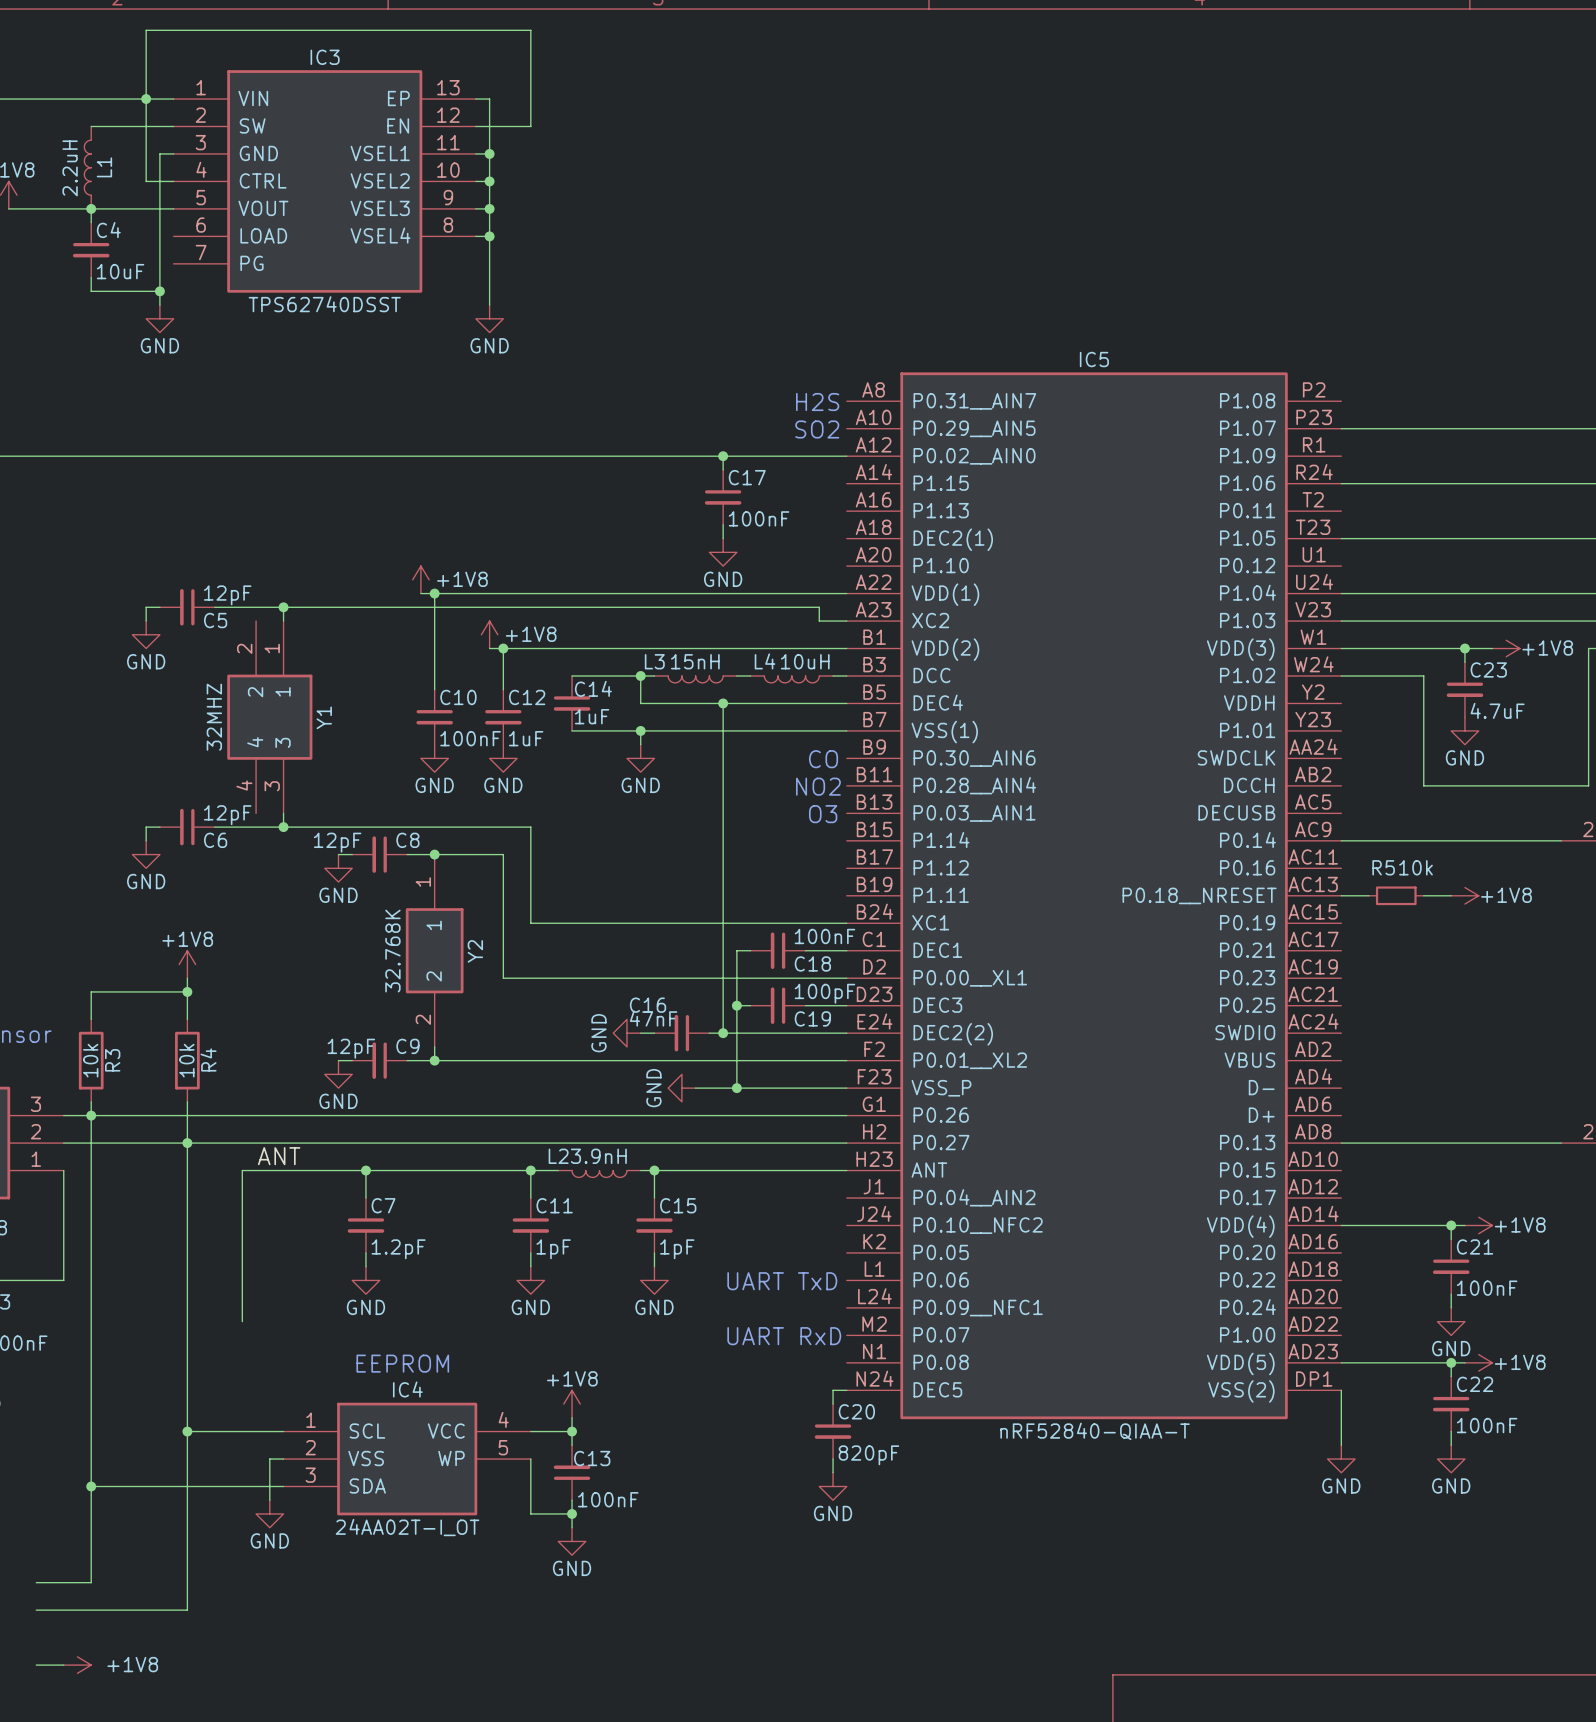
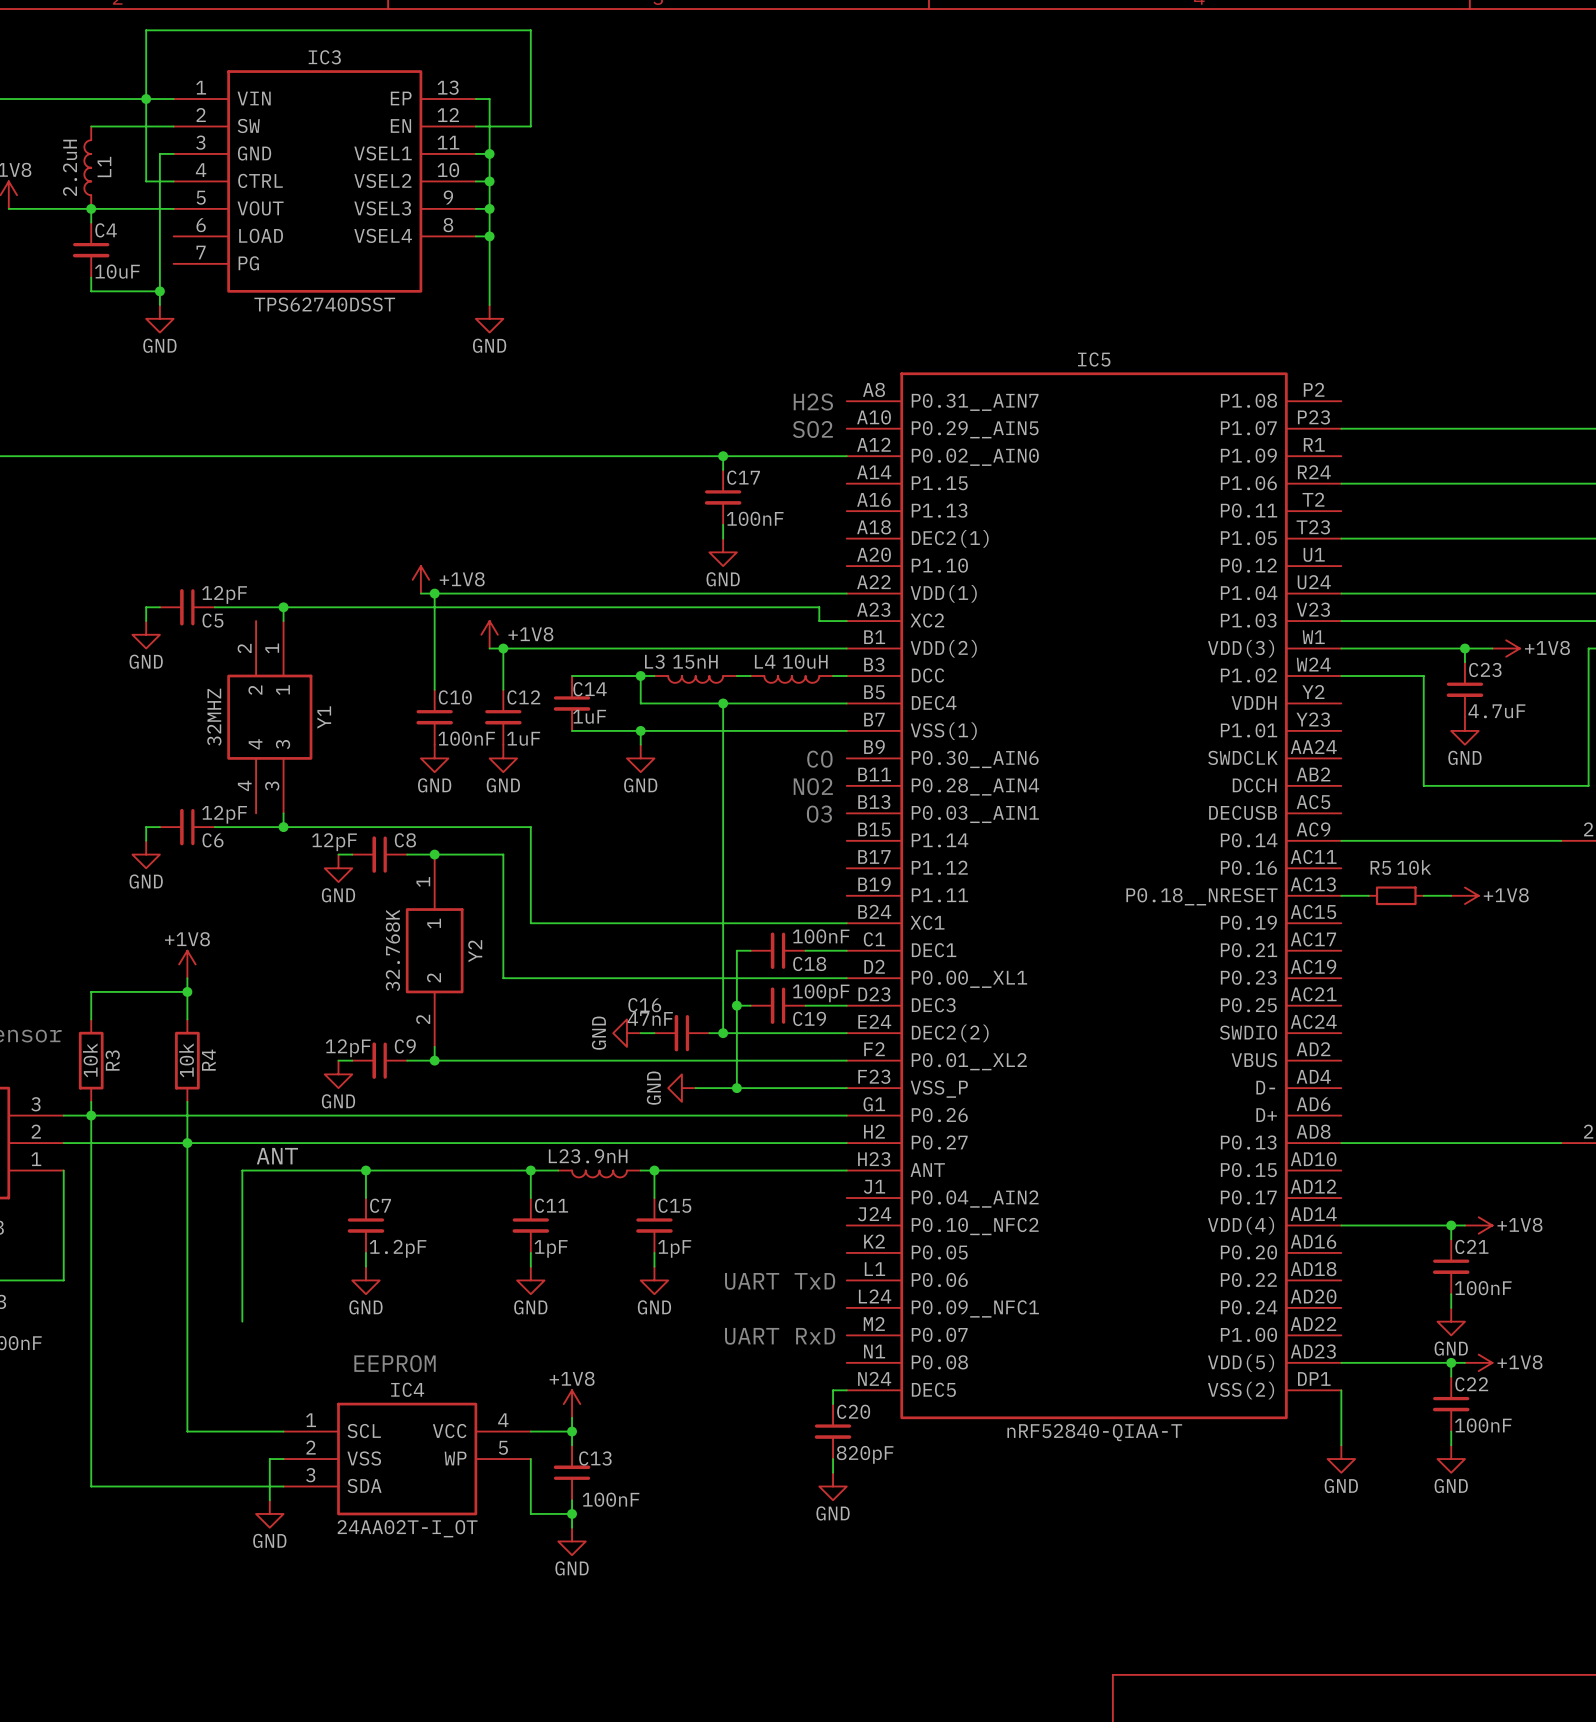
wire: (187, 1431) (187, 1610) (36, 1610) -> none
junction: (187, 1431) -> none
wire: (91, 1486) (91, 1582) (36, 1582) -> none
junction: (91, 1486) -> none
wire: (36, 1665) (63, 1665) -> none
power symbol: +1V8 (77, 1665) -> none

